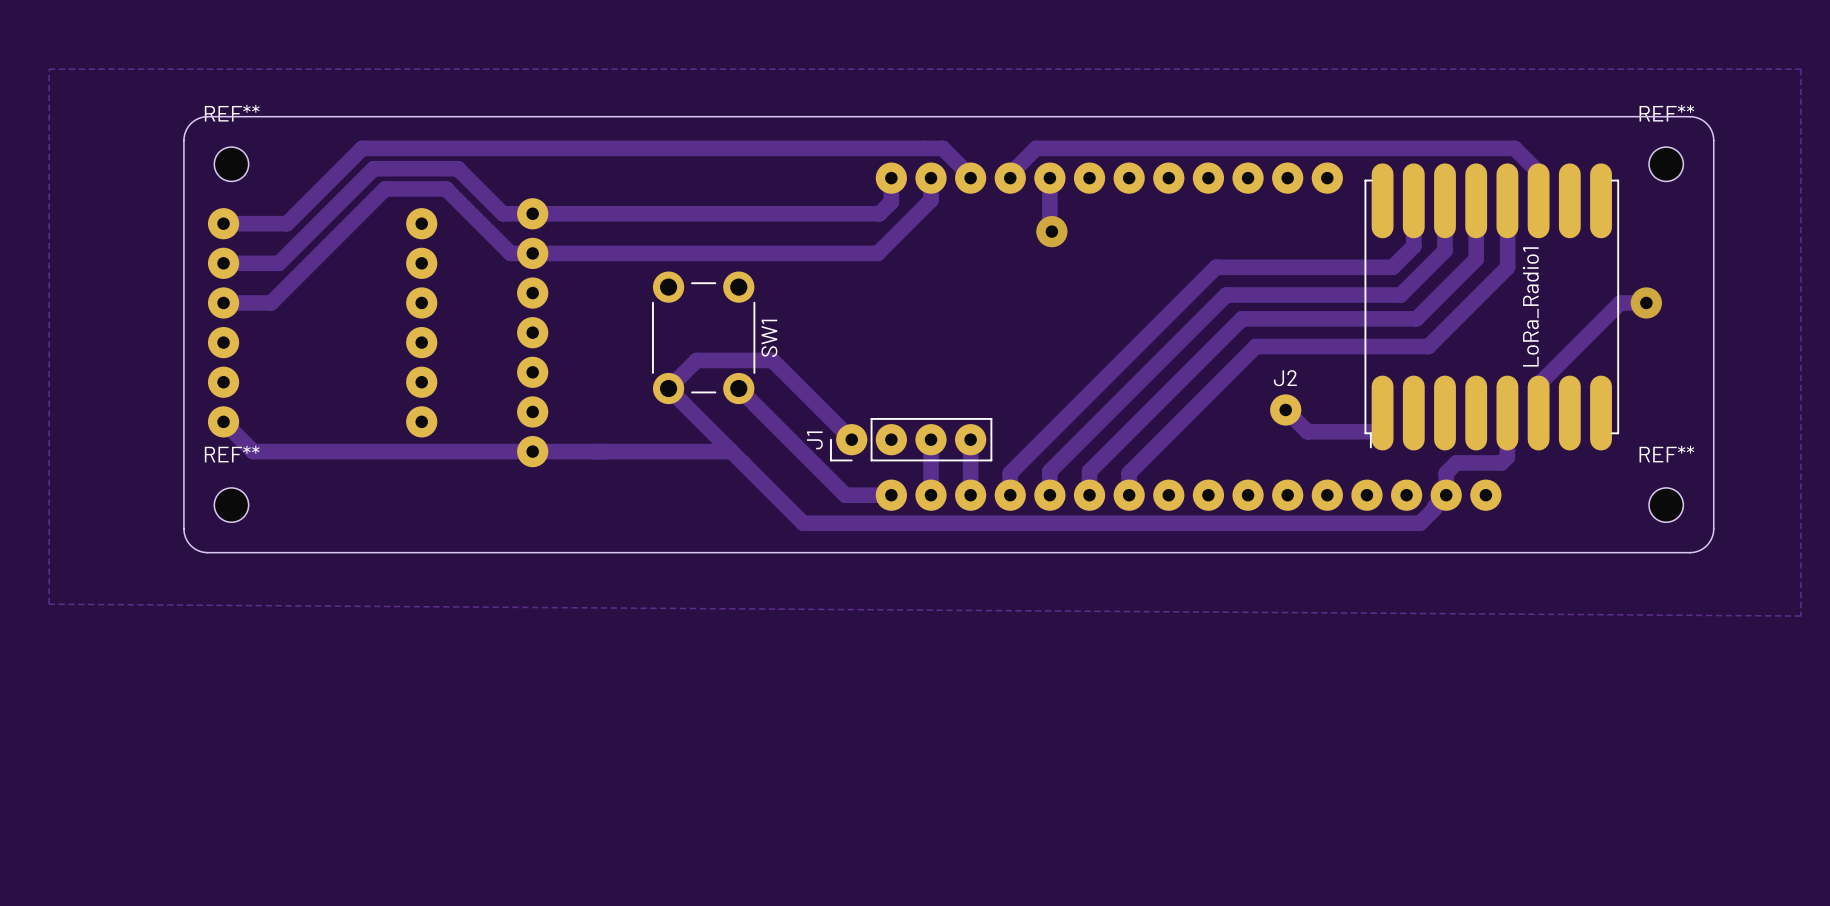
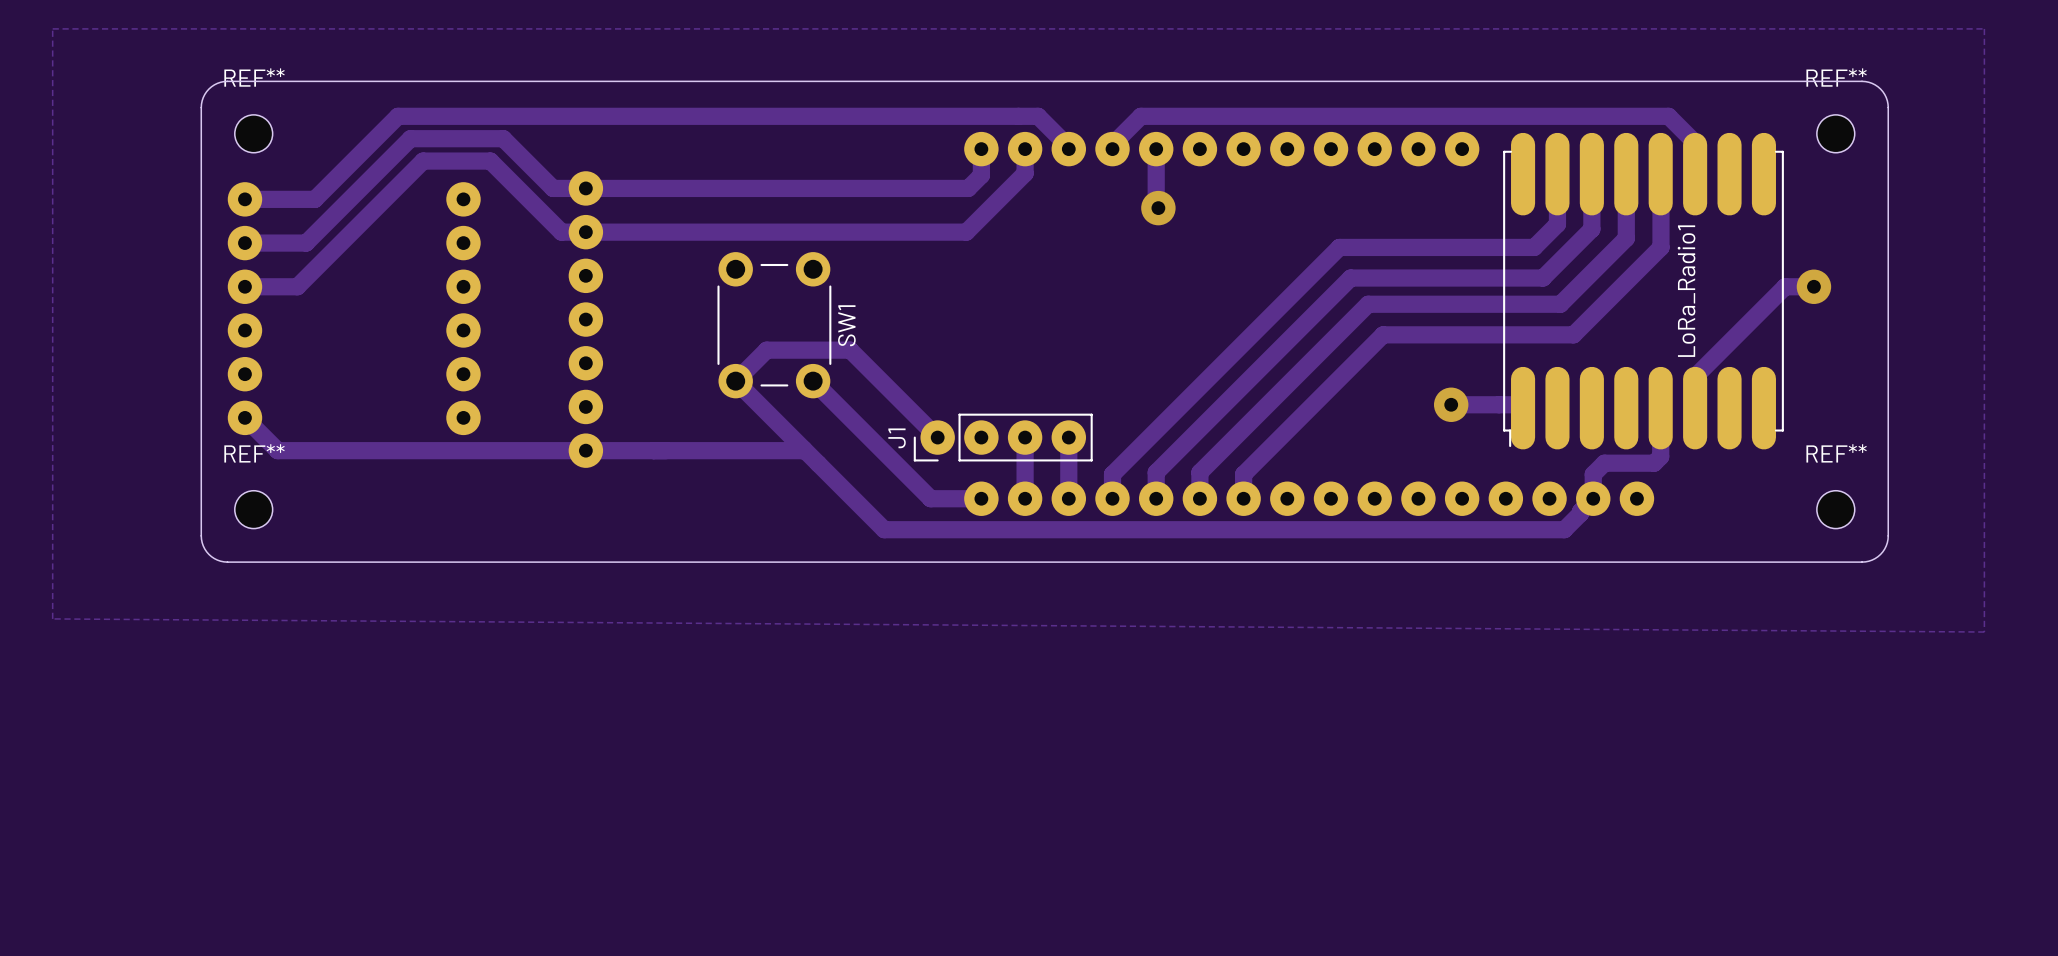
track: (1285, 409) (1307, 431) (1382, 431) -> (1451, 404) (1521, 404) (1523, 406) (1523, 428)
J2: (1285, 409) -> none
via: none -> (1451, 404)

